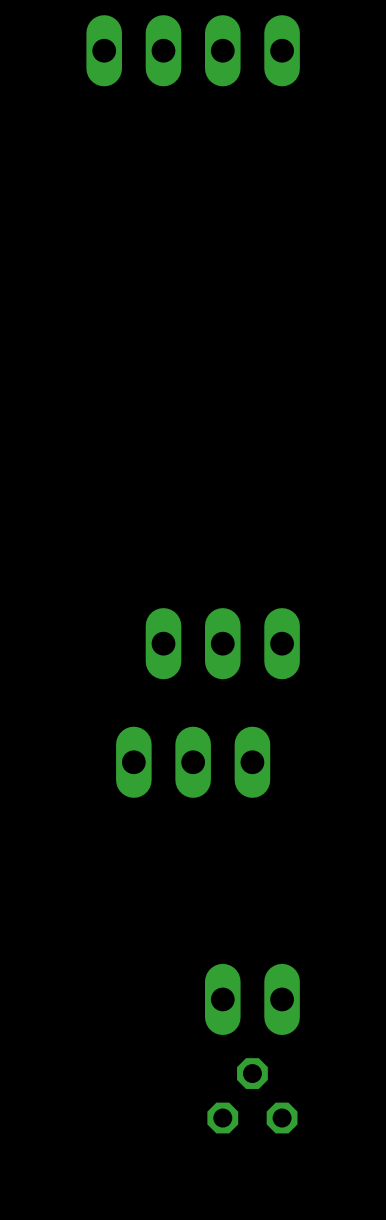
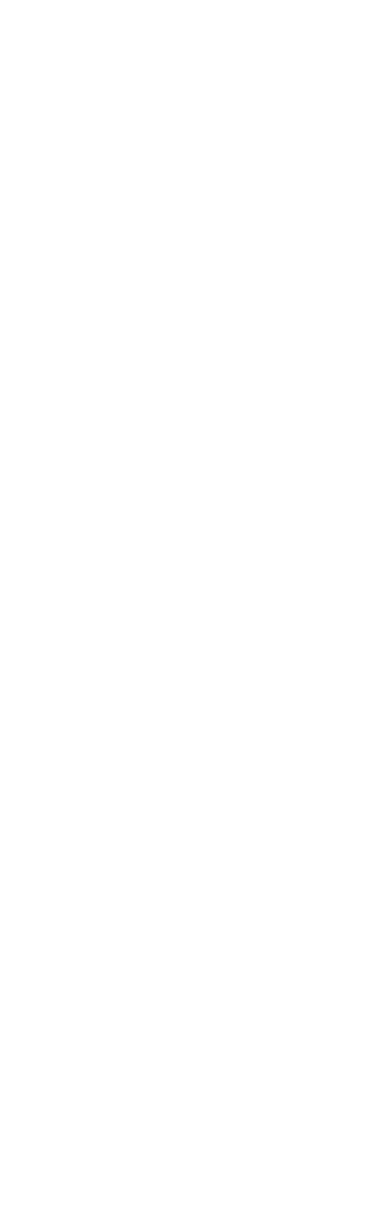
part: (193, 50) -> none
part: (222, 643) -> none
part: (193, 762) -> none
part: (252, 999) -> none
part: (252, 1095) -> none

